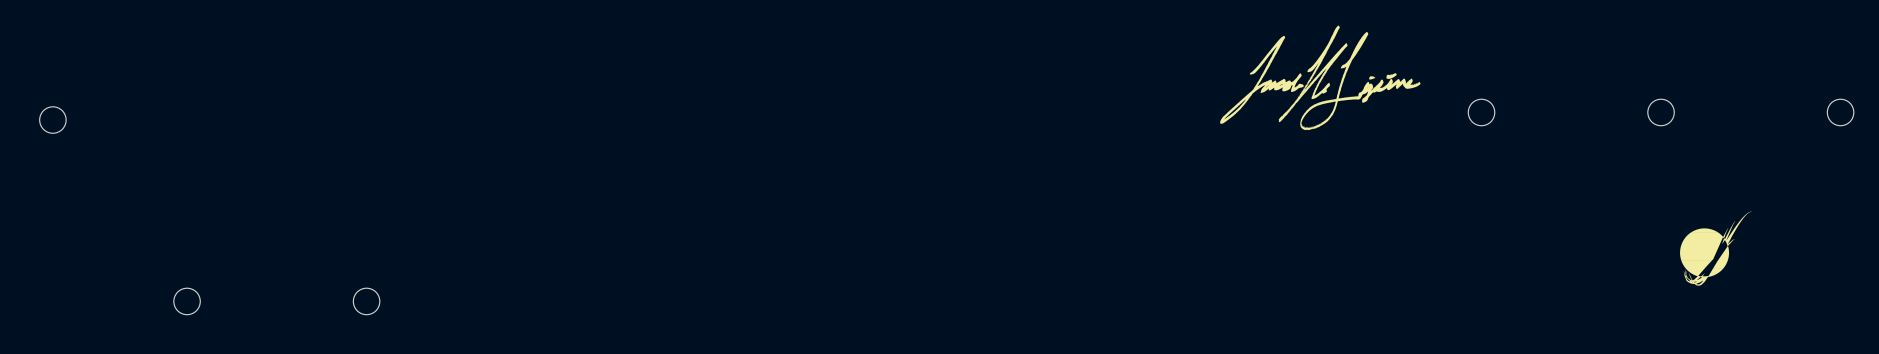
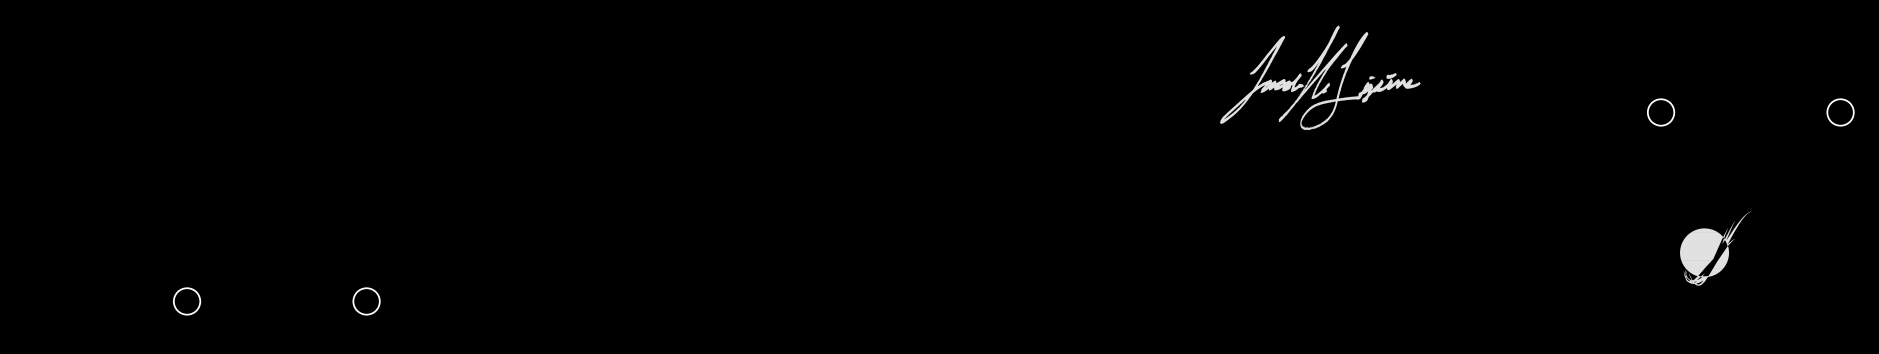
drawing: [1468, 99, 1495, 126] -> none
drawing: [39, 106, 67, 134] -> none

